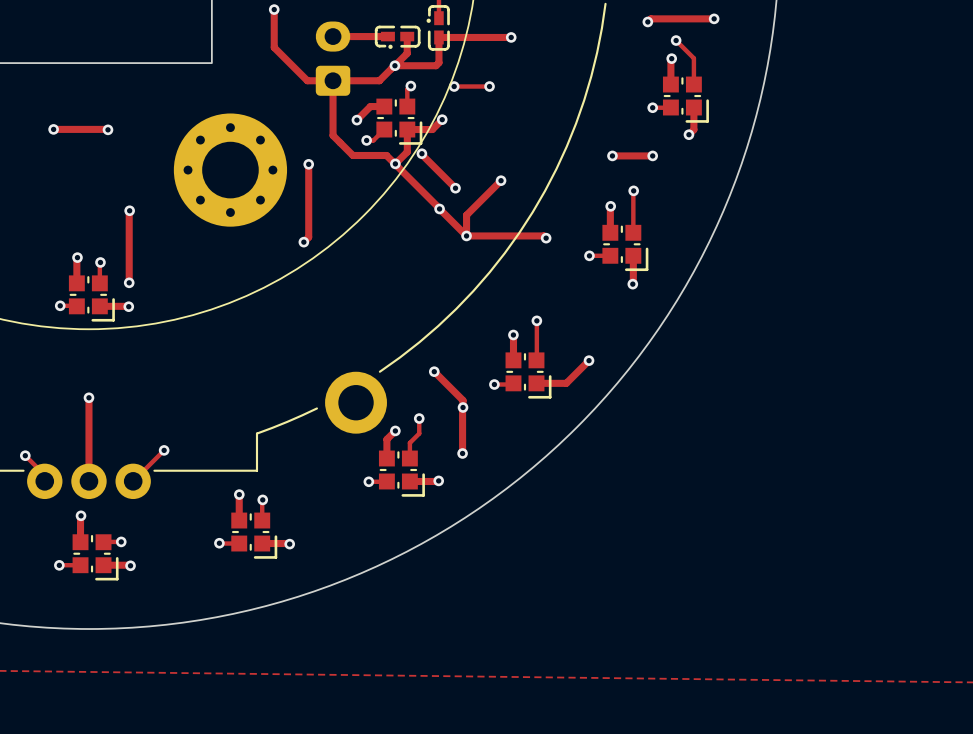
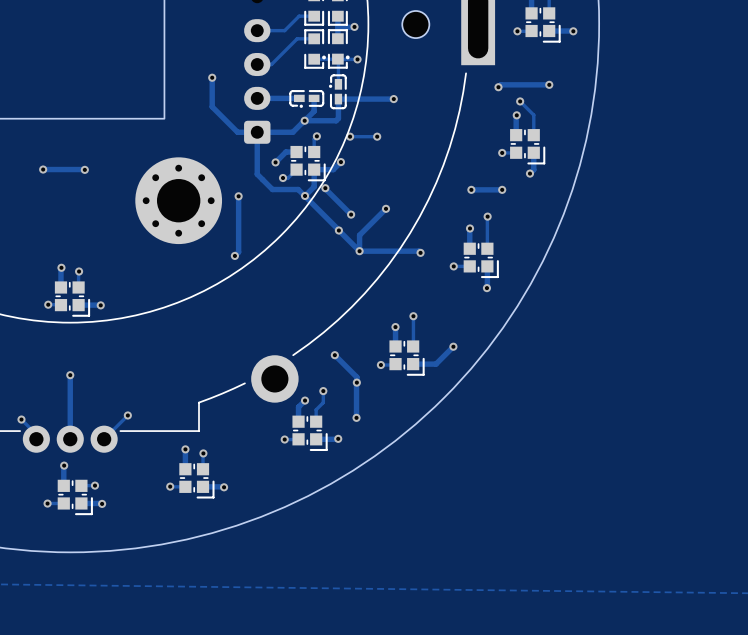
track: (129, 210) (128, 283) -> none
via: (129, 210) -> none
via: (129, 282) -> none

